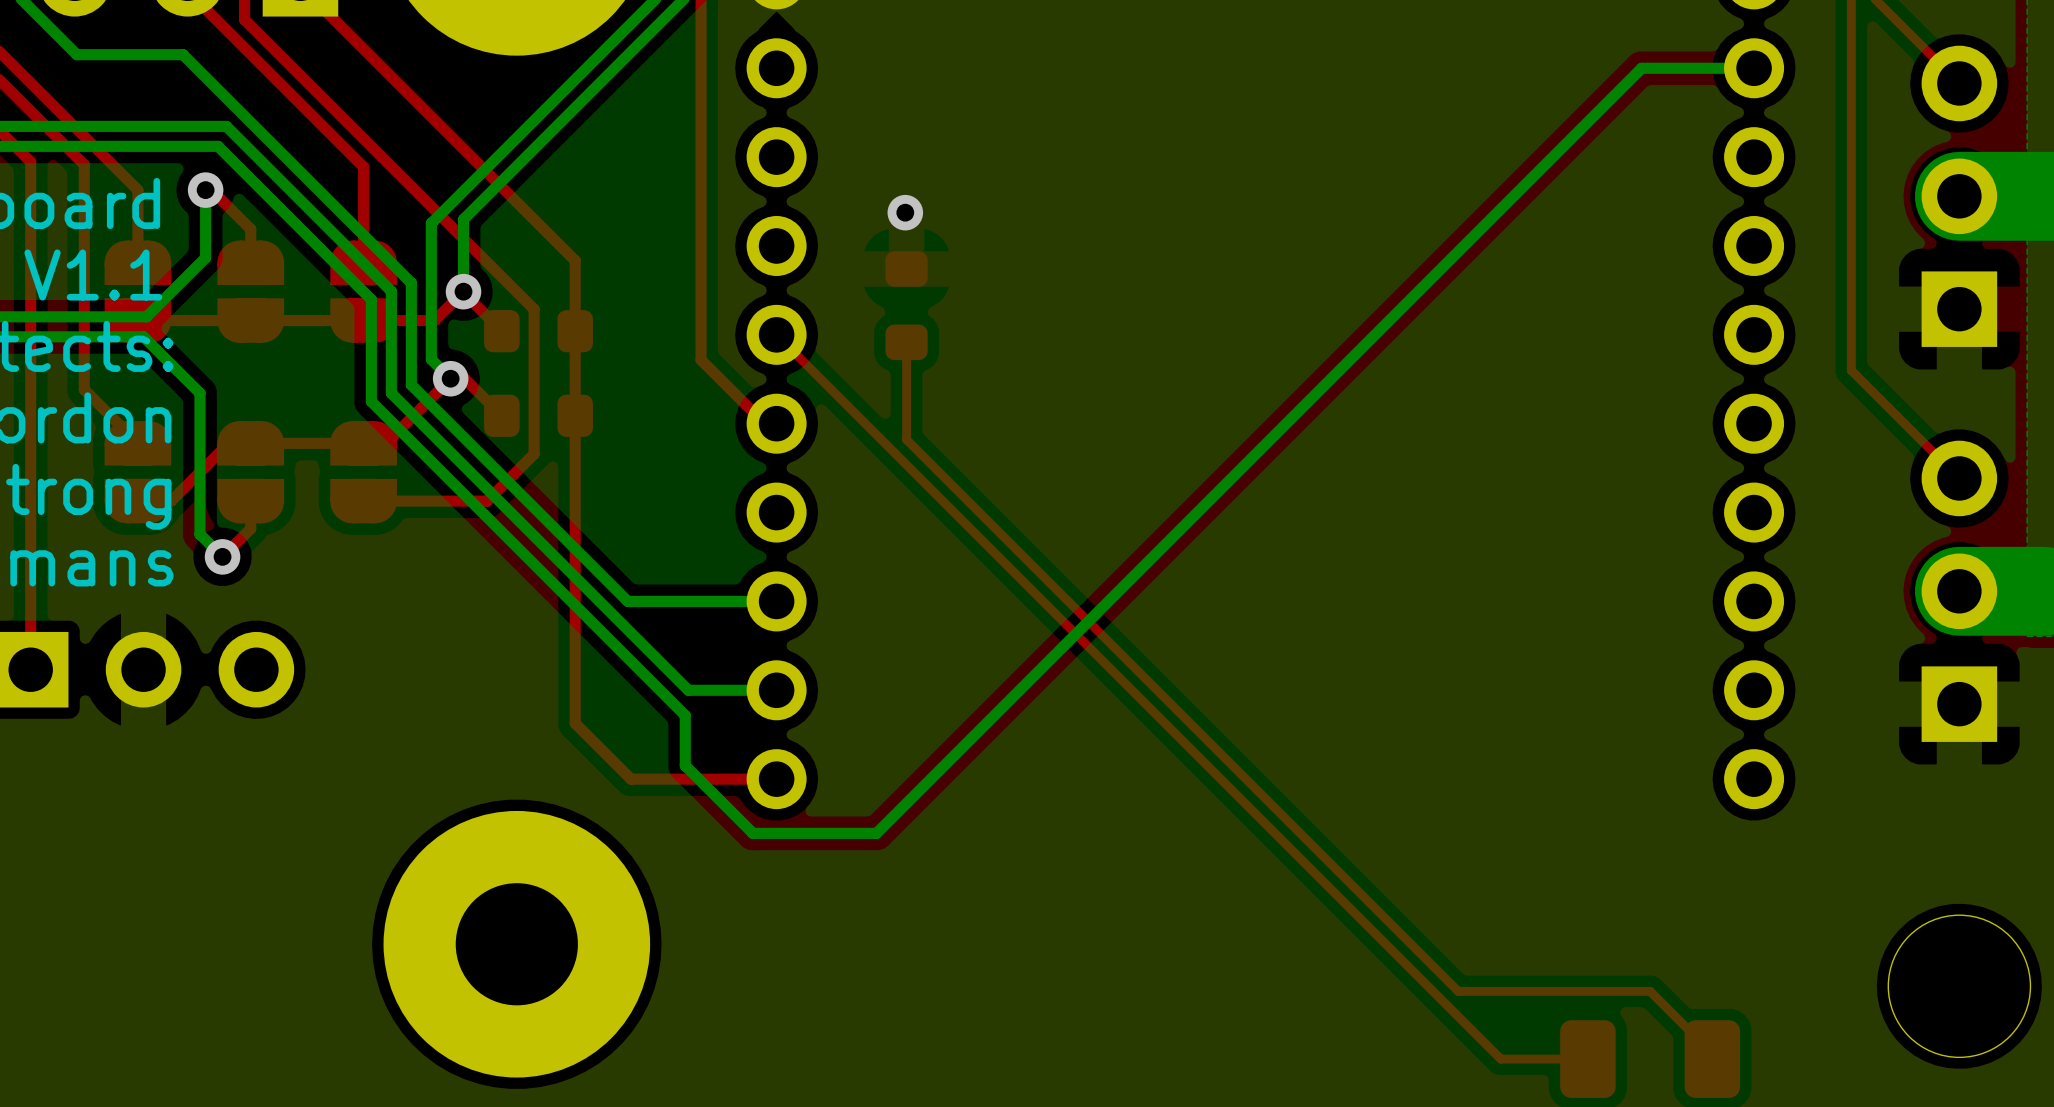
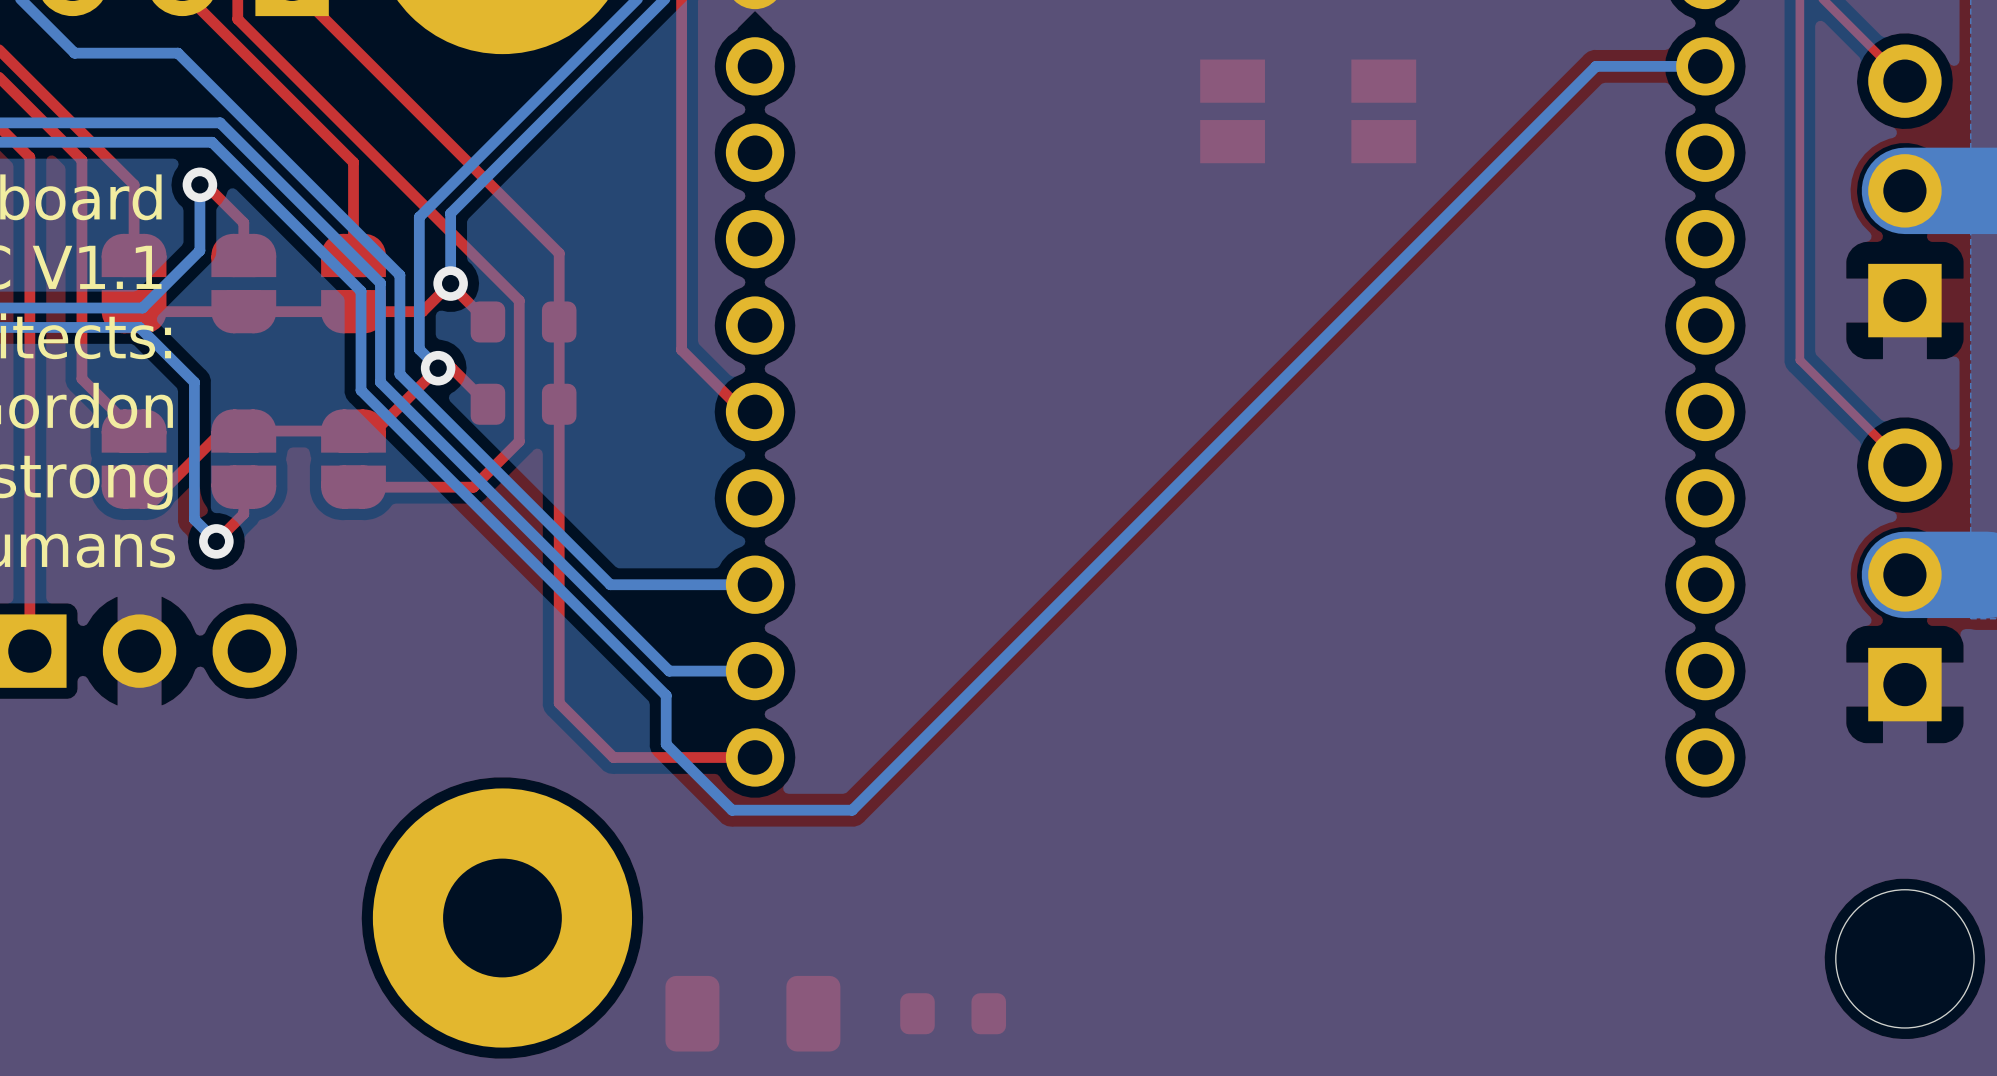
part: none -> (1308, 111)
via: (905, 212) -> none
part rotation: 0° (906, 305) -> 90° clockwise (953, 1013)
part position: (906, 305) -> (953, 1013)
top track: (776, 334) (1500, 1059) (1587, 1059) -> none
top track: (906, 342) (906, 439) (1458, 991) (1650, 991) (1712, 1053) (1712, 1059) -> none
part position: (1650, 1059) -> (752, 1013)

